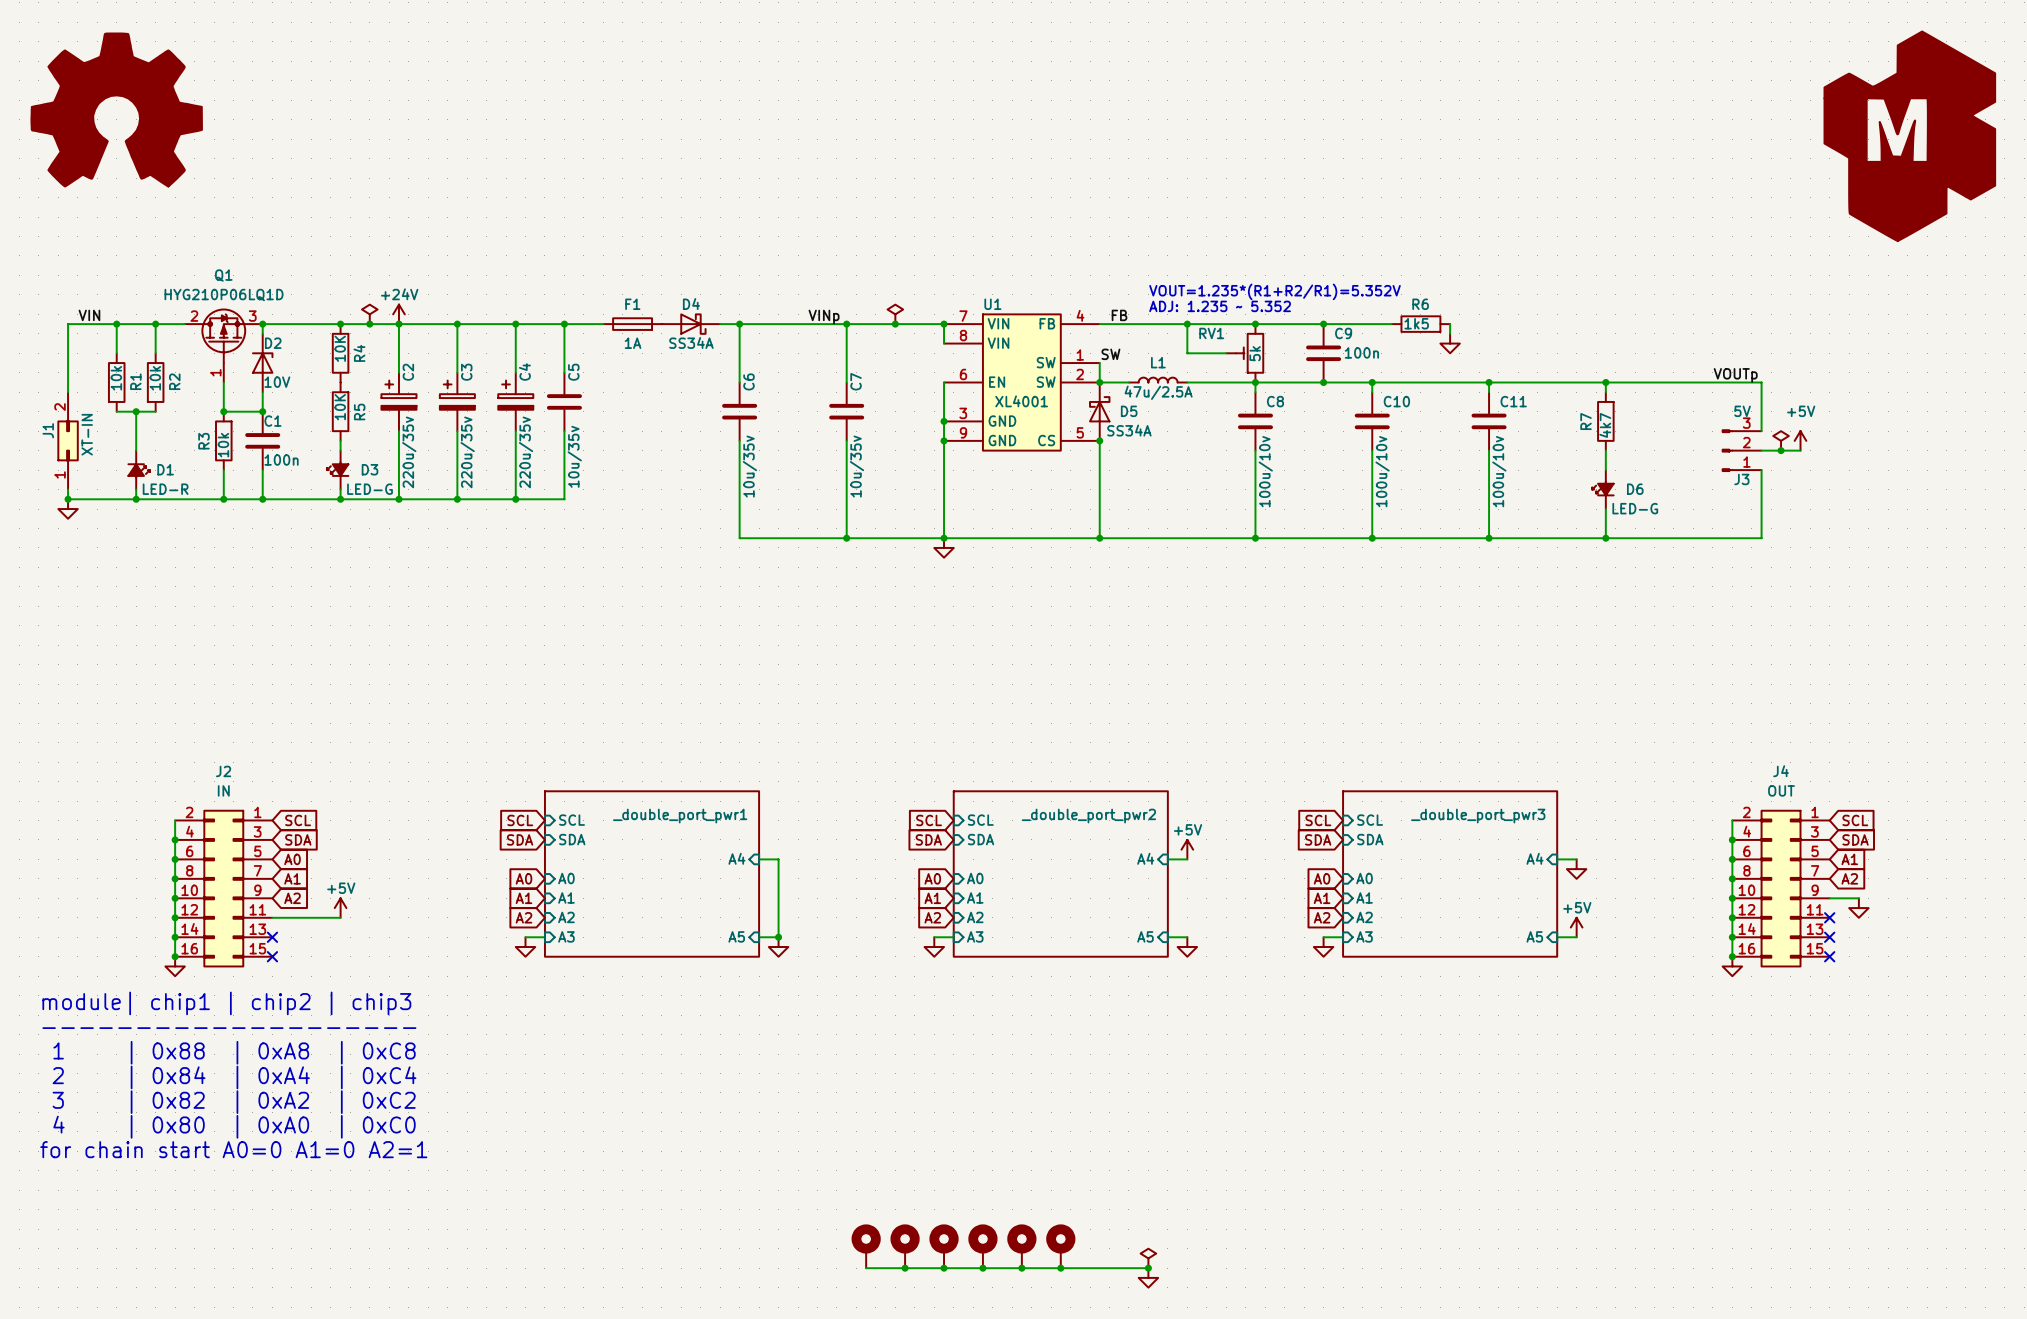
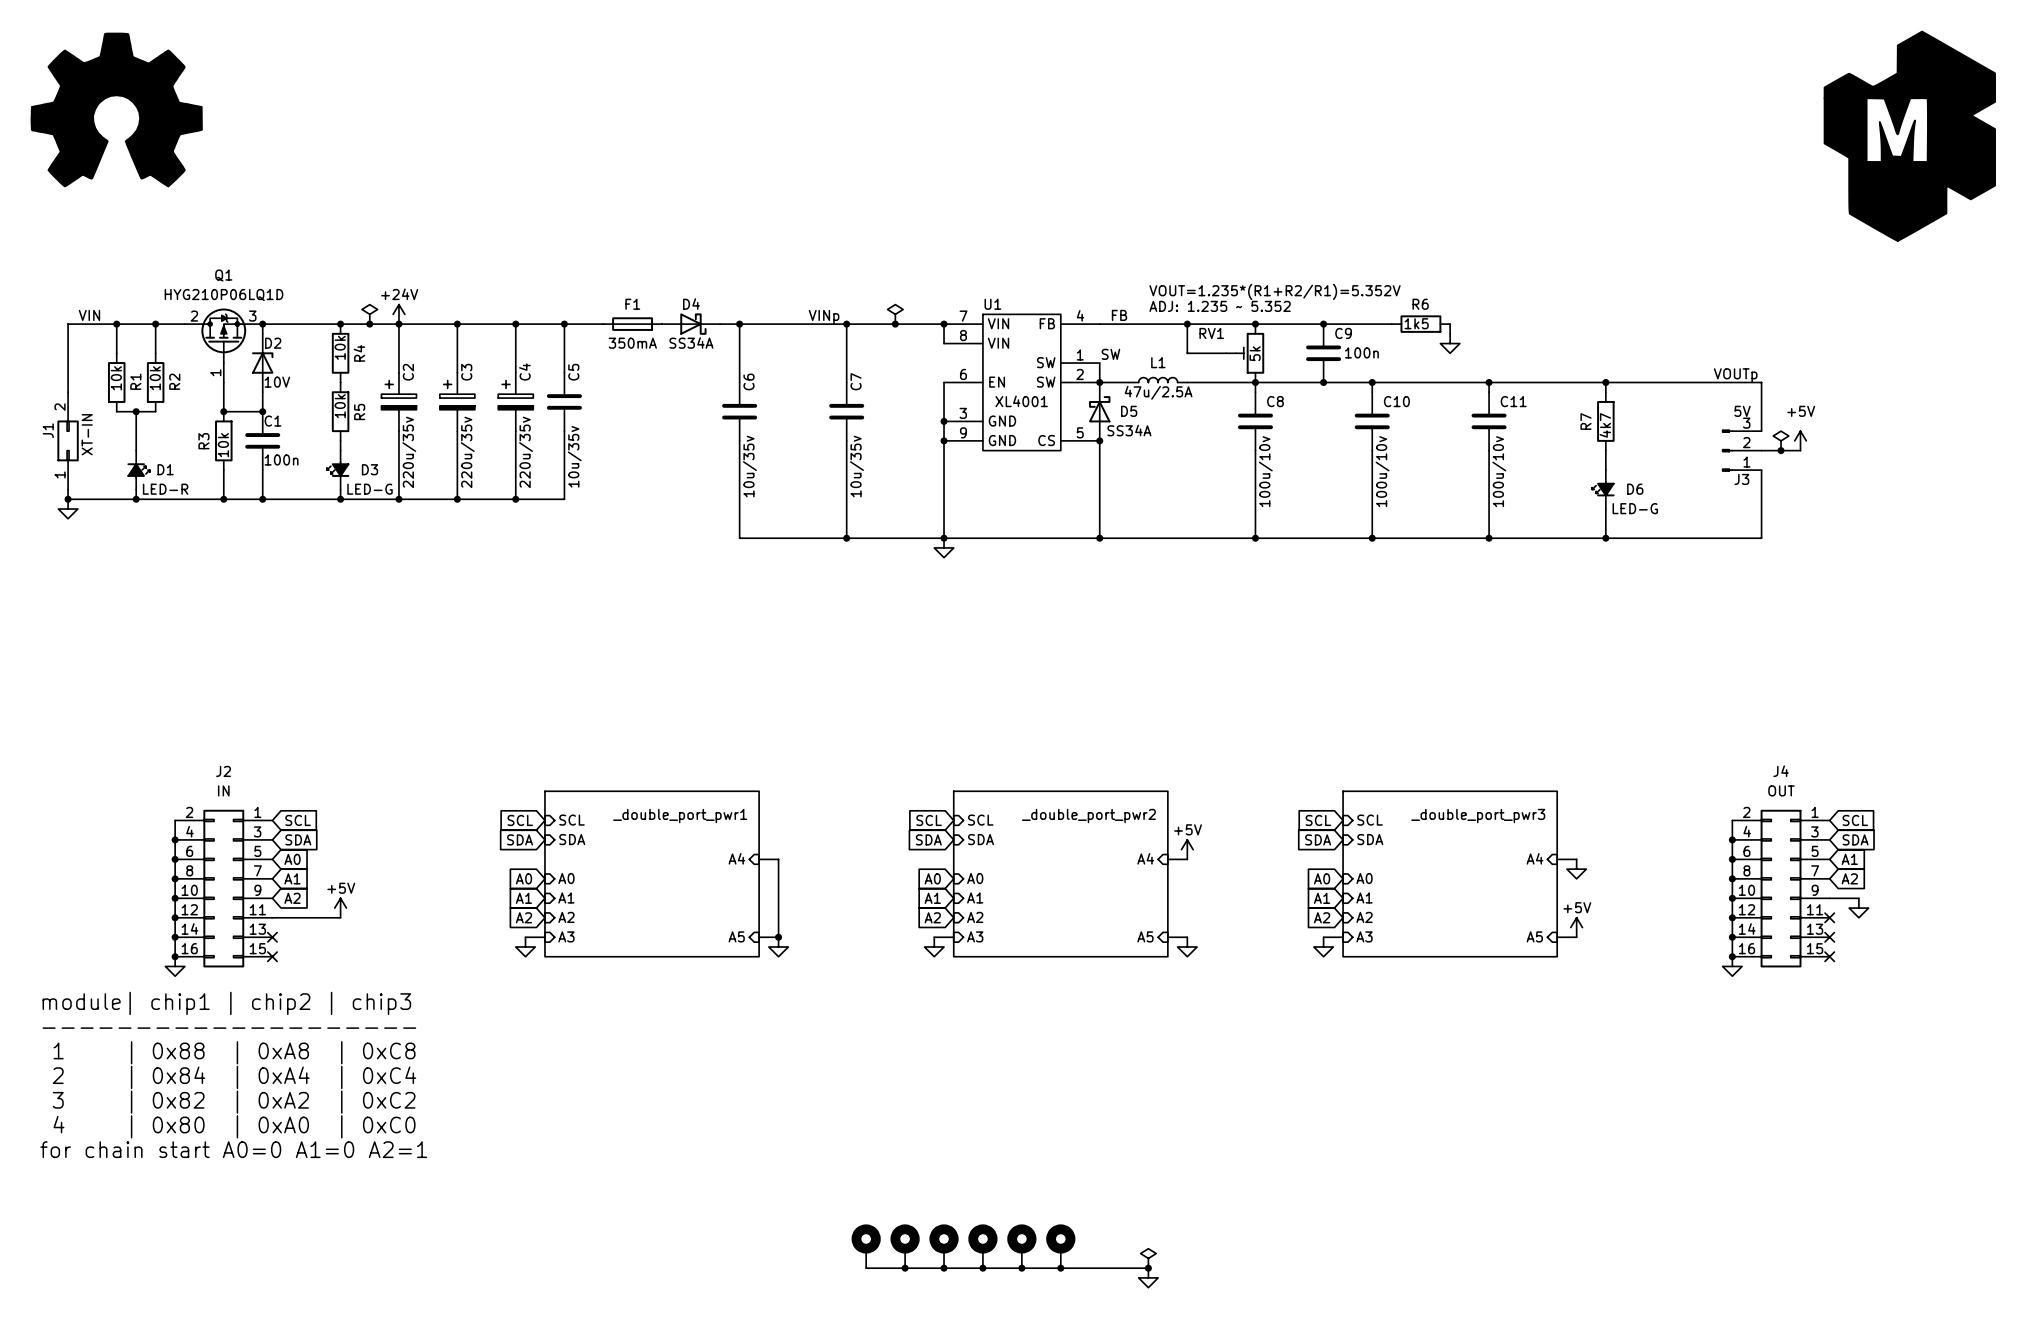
F1 value: 1A (633, 343) -> 350mA (632, 343)
R4 value: 10K (340, 348) -> 10k (340, 347)
R5 value: 10K (340, 407) -> 10k (340, 406)

